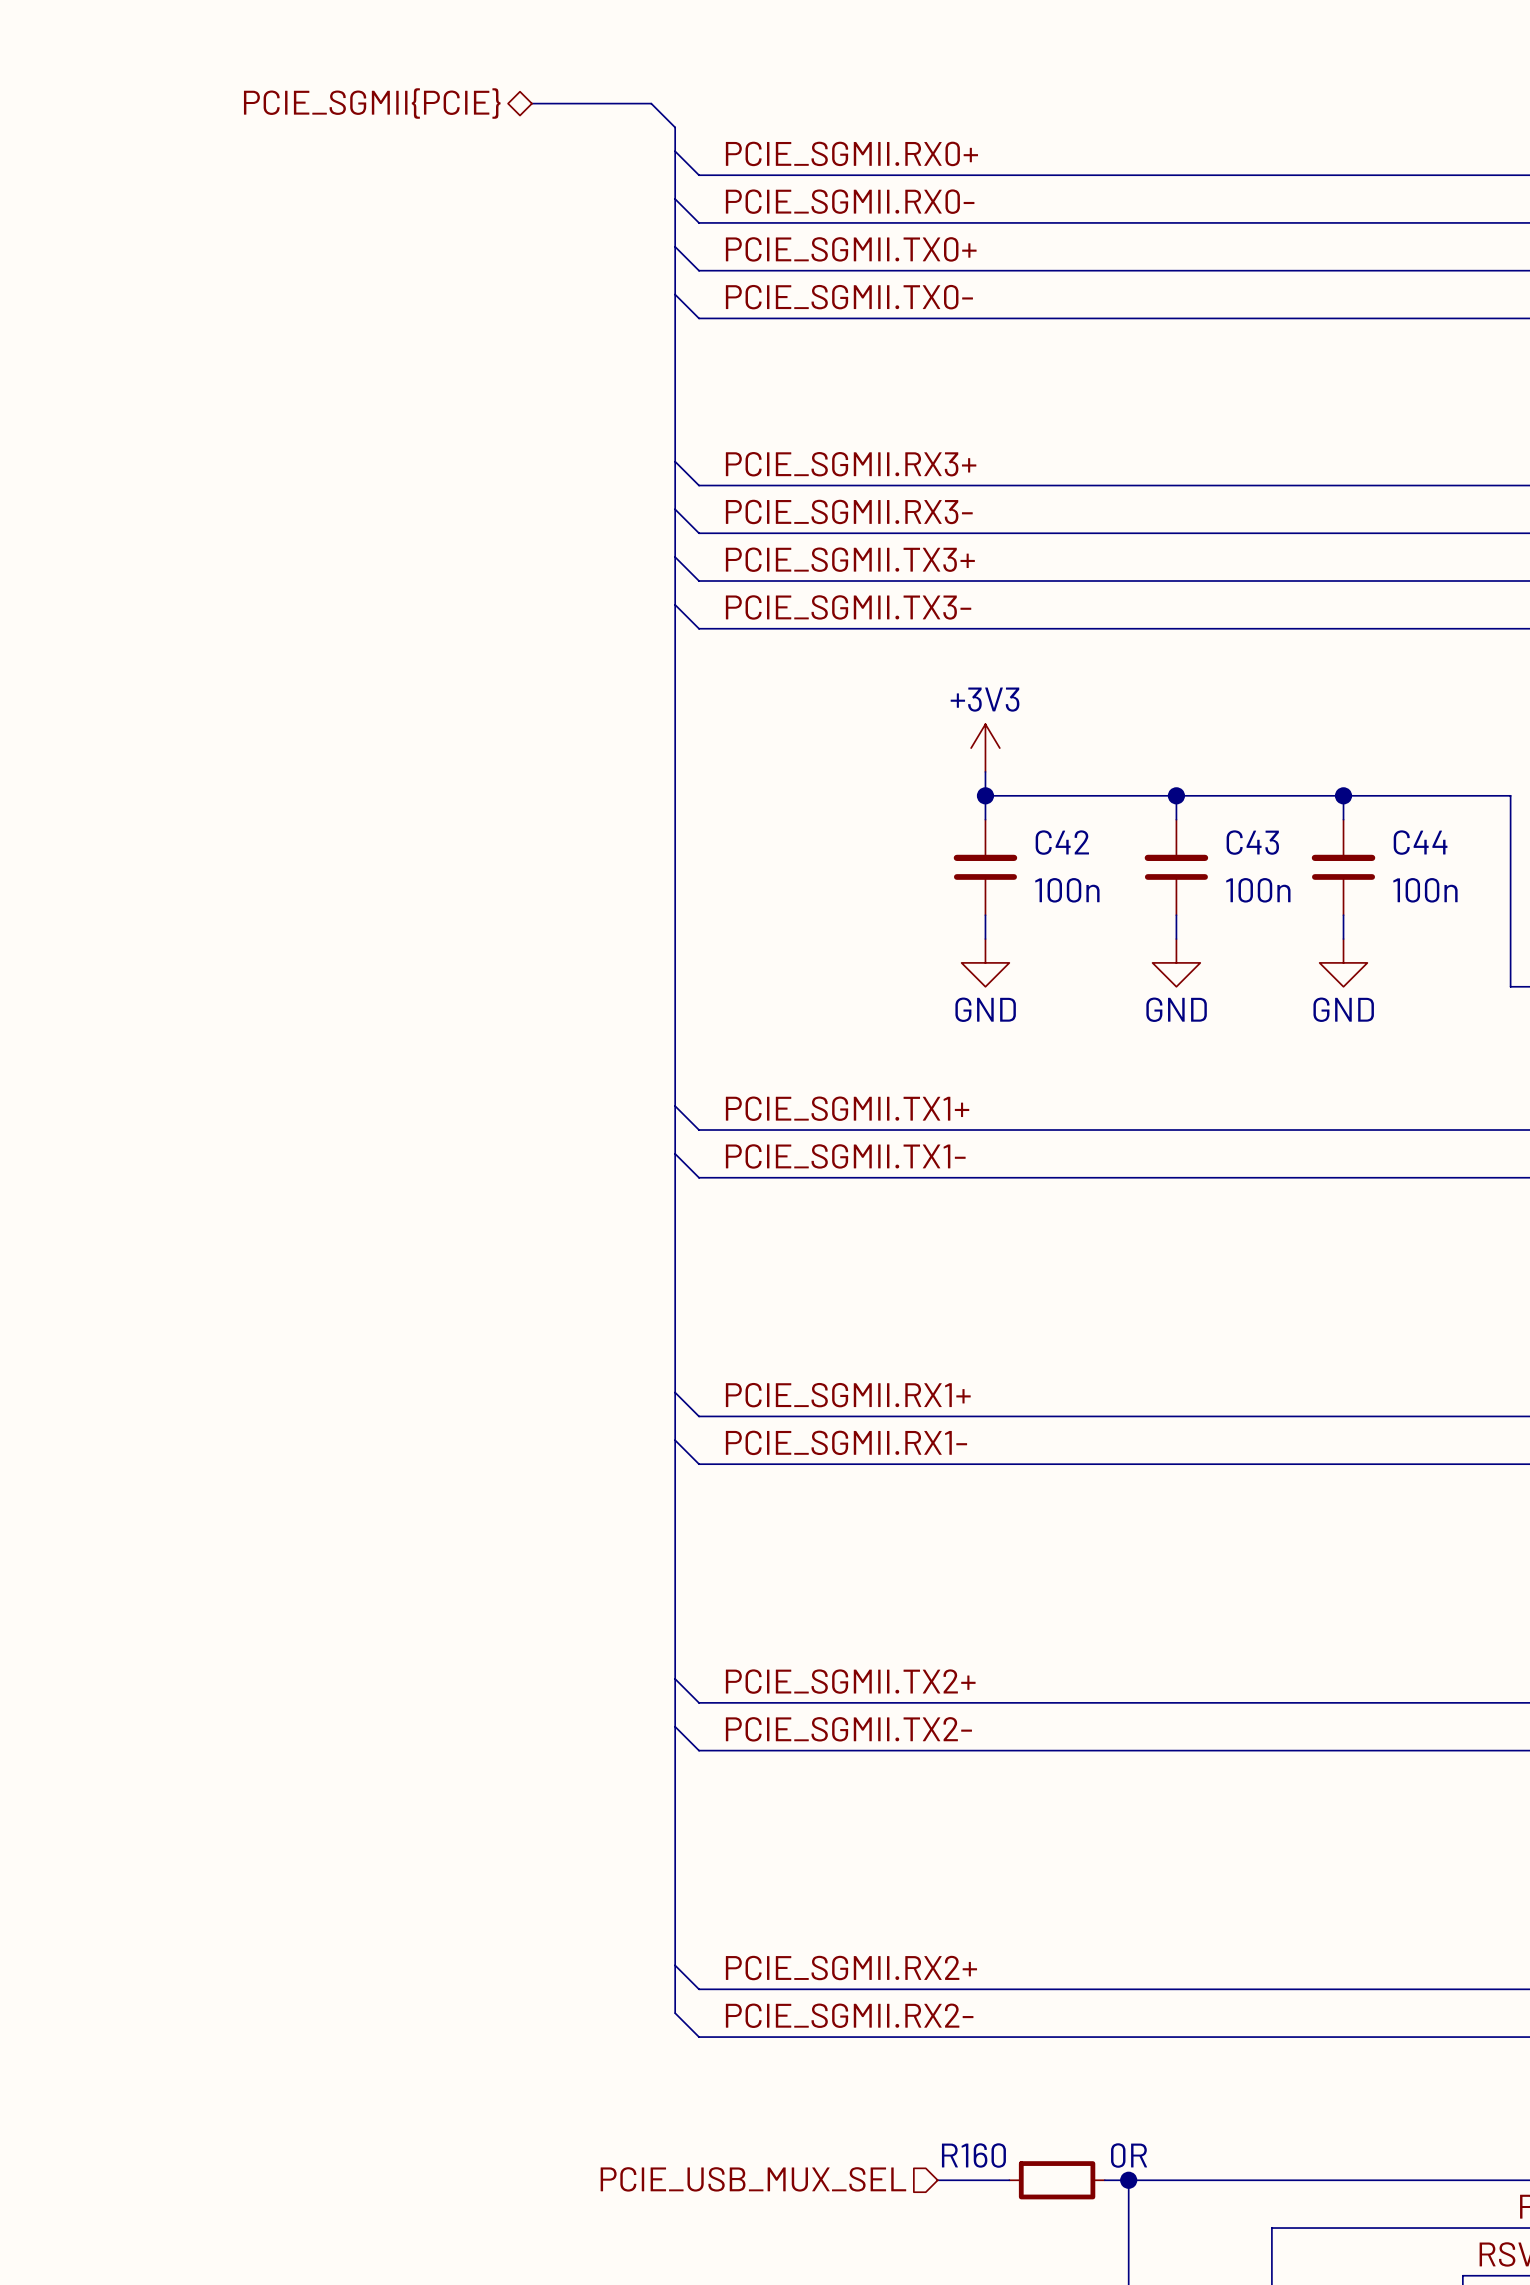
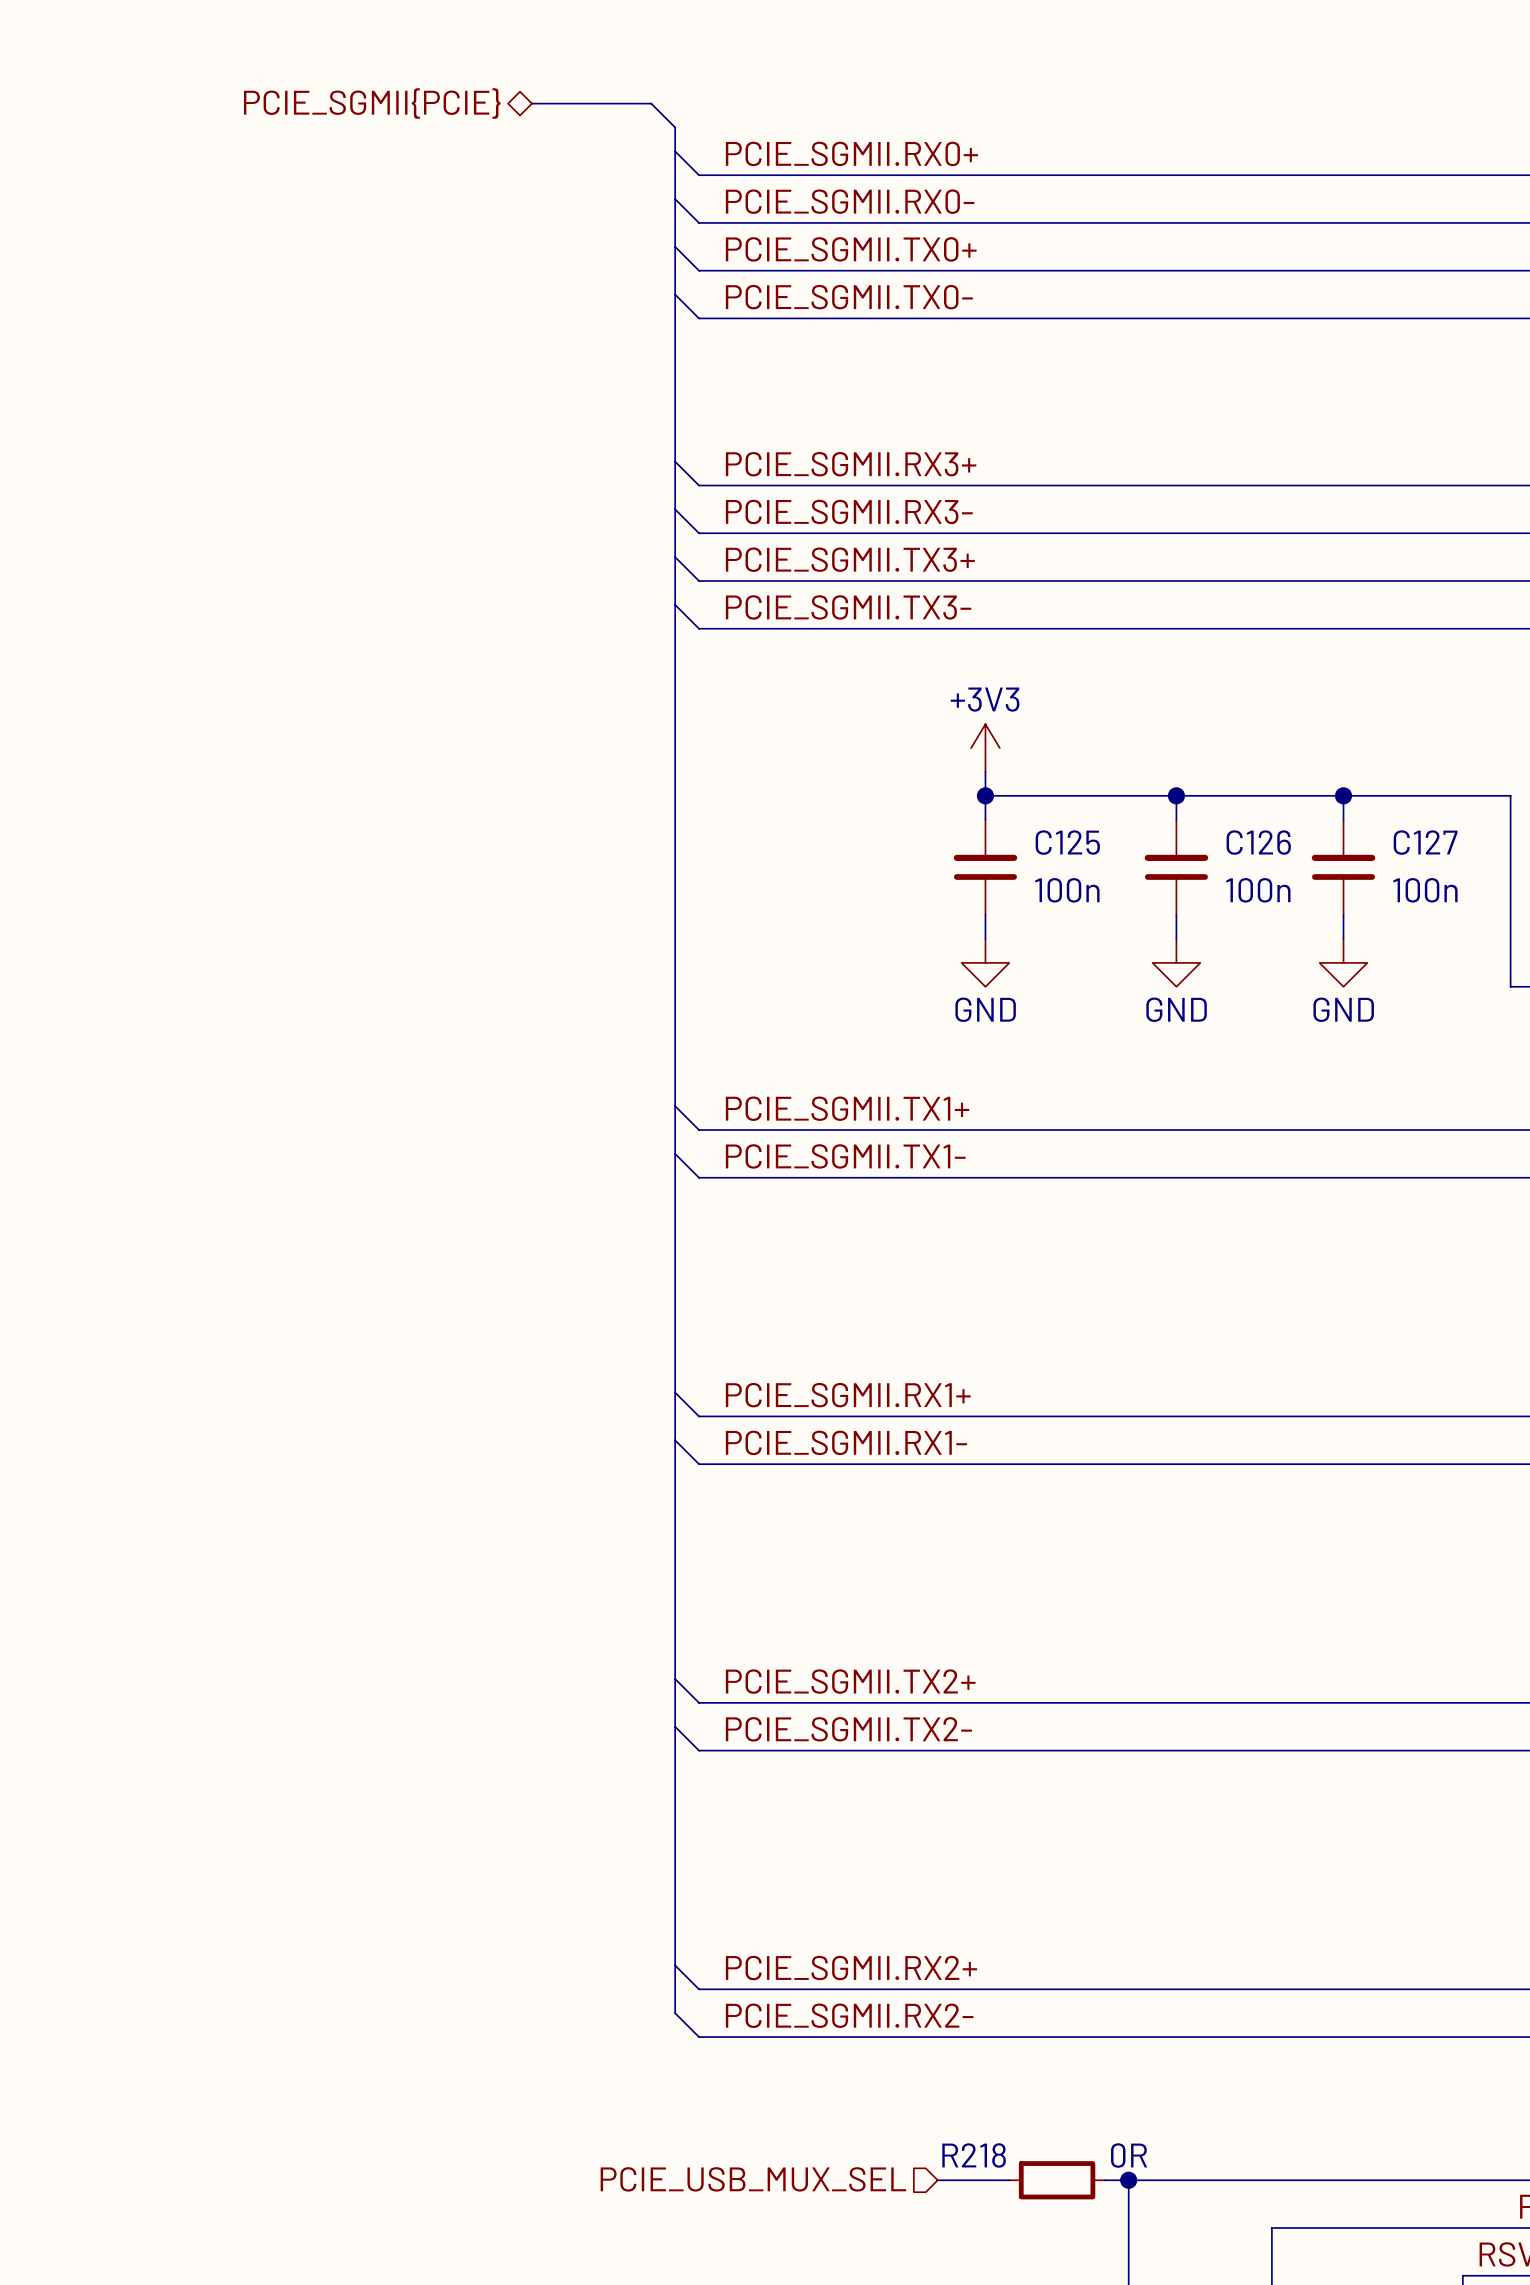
C42 name: C42 (1062, 842) -> C125 (1067, 842)
C43 name: C43 (1252, 842) -> C126 (1258, 842)
C44 name: C44 (1420, 842) -> C127 (1425, 842)
R160 name: R160 (973, 2155) -> R218 (974, 2155)

